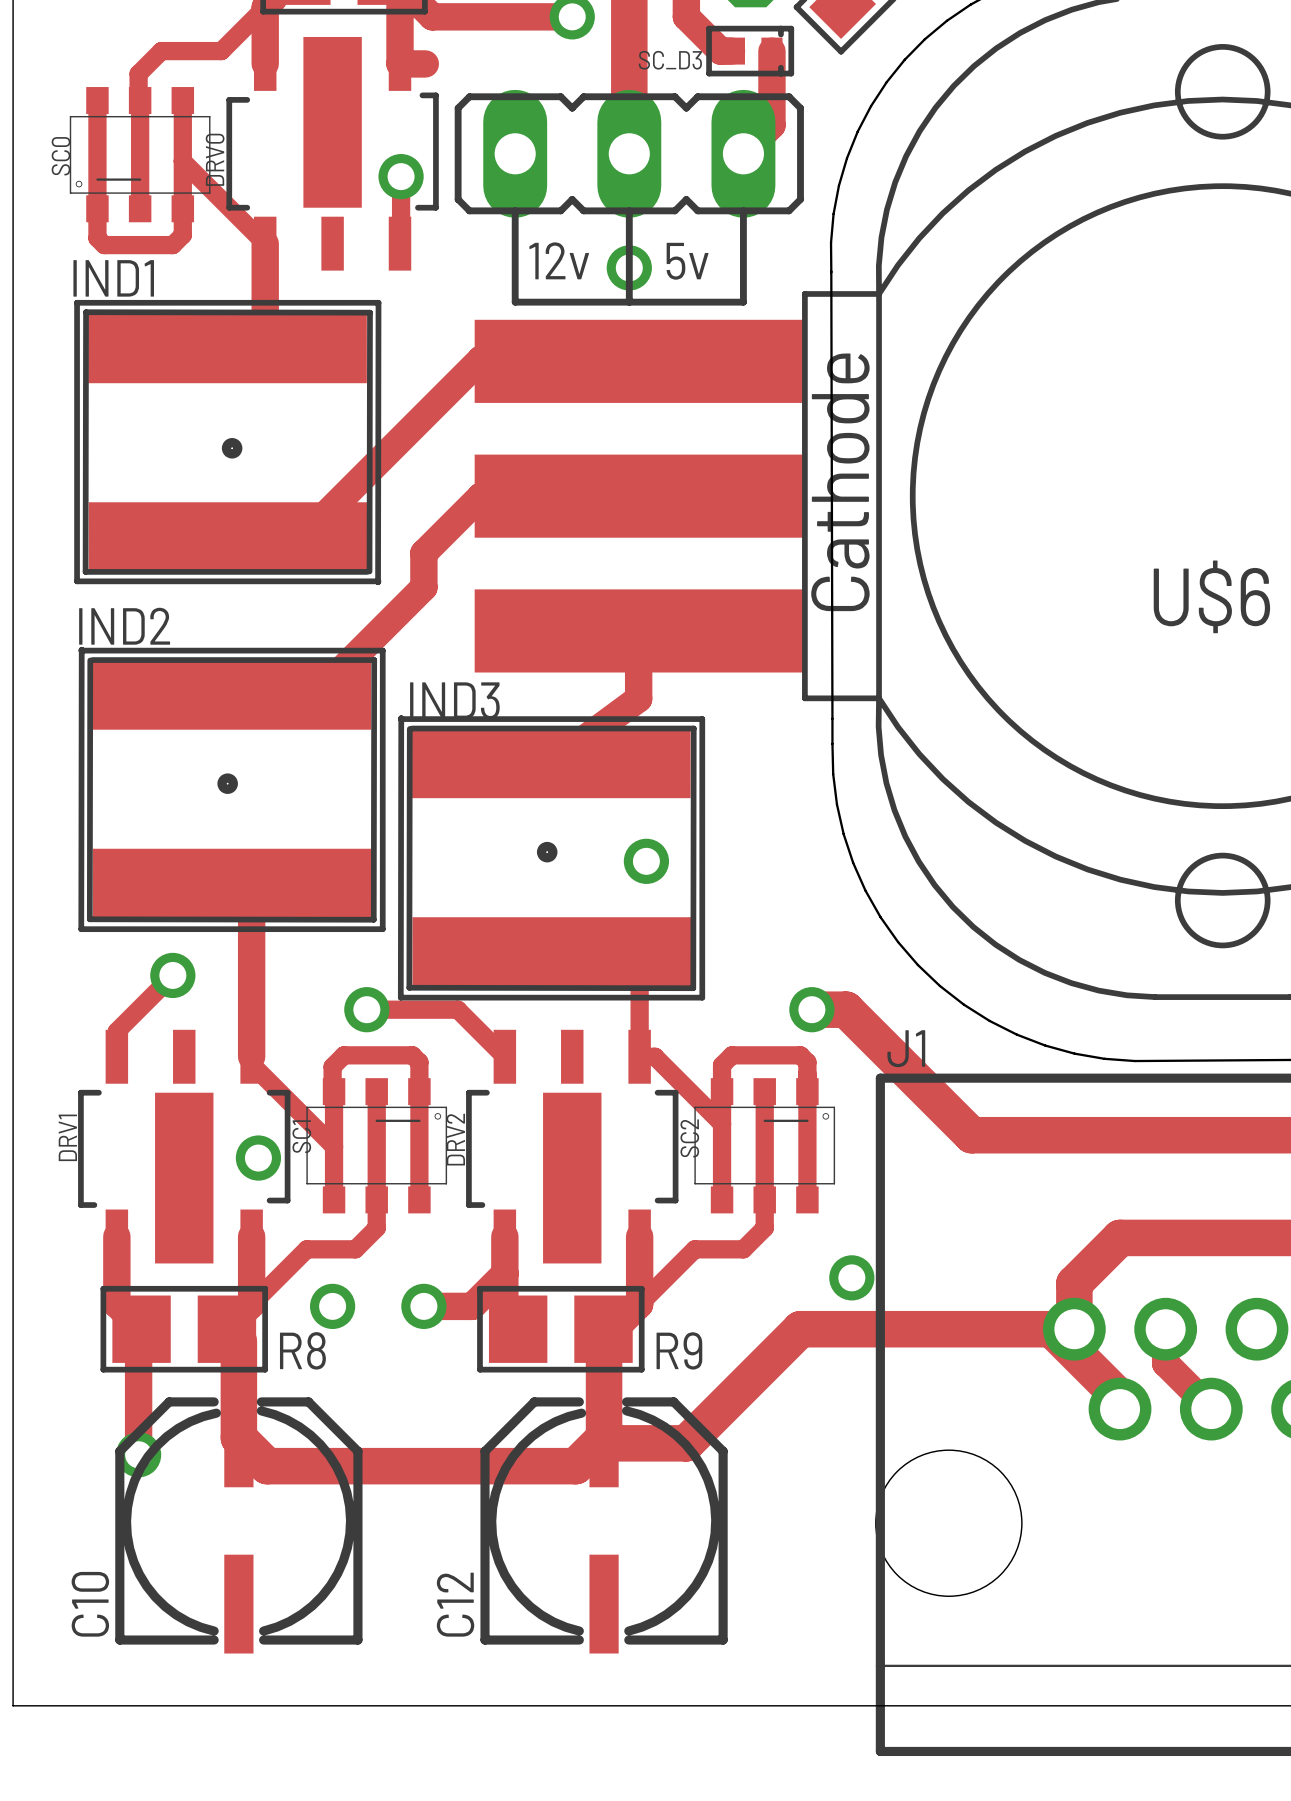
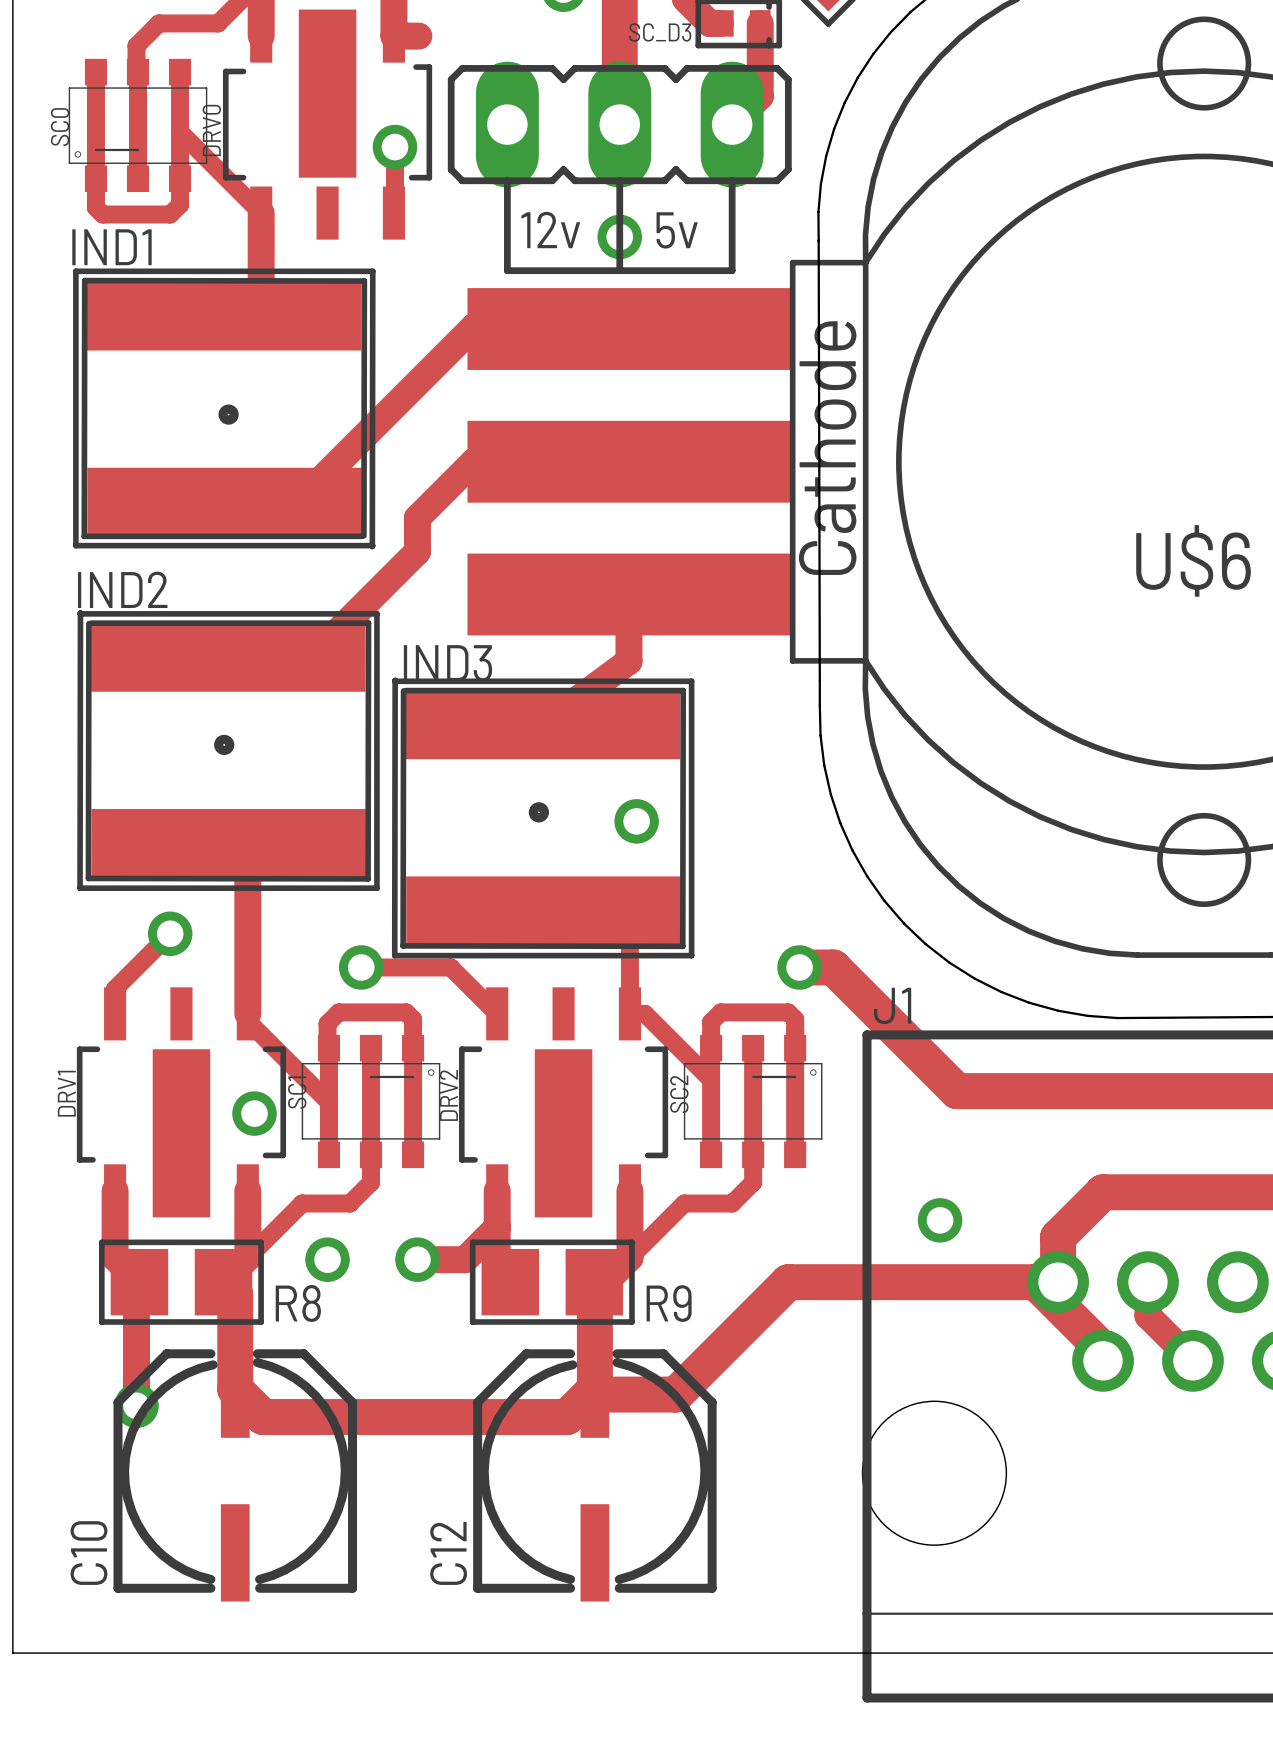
via position: (851, 1277) -> (940, 1220)

